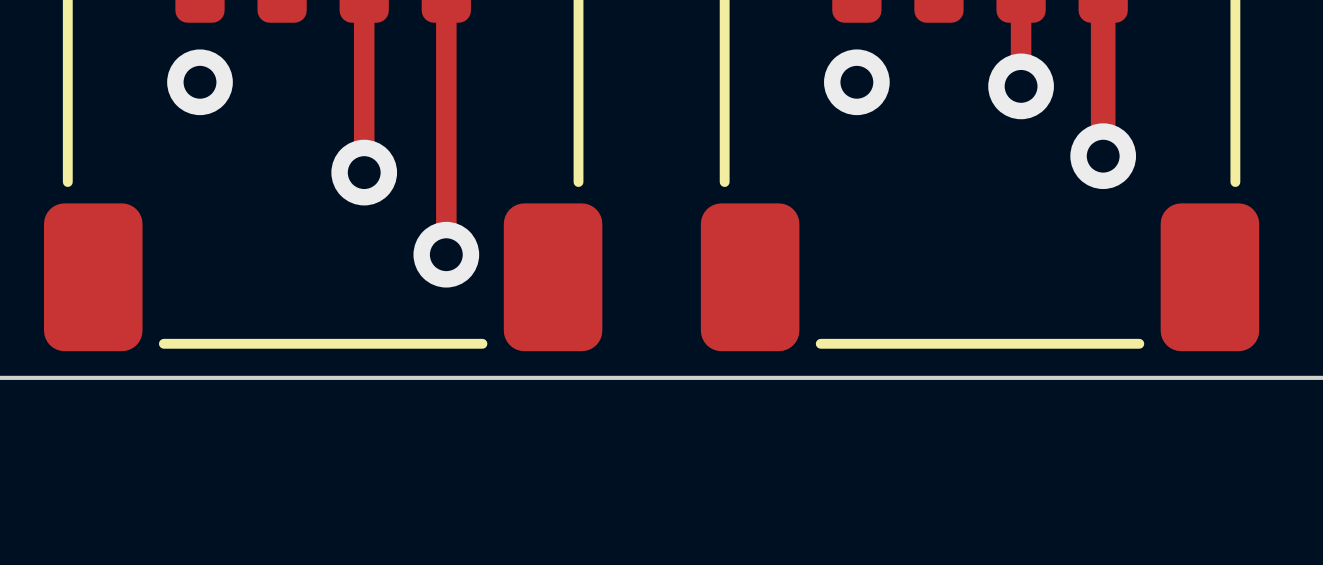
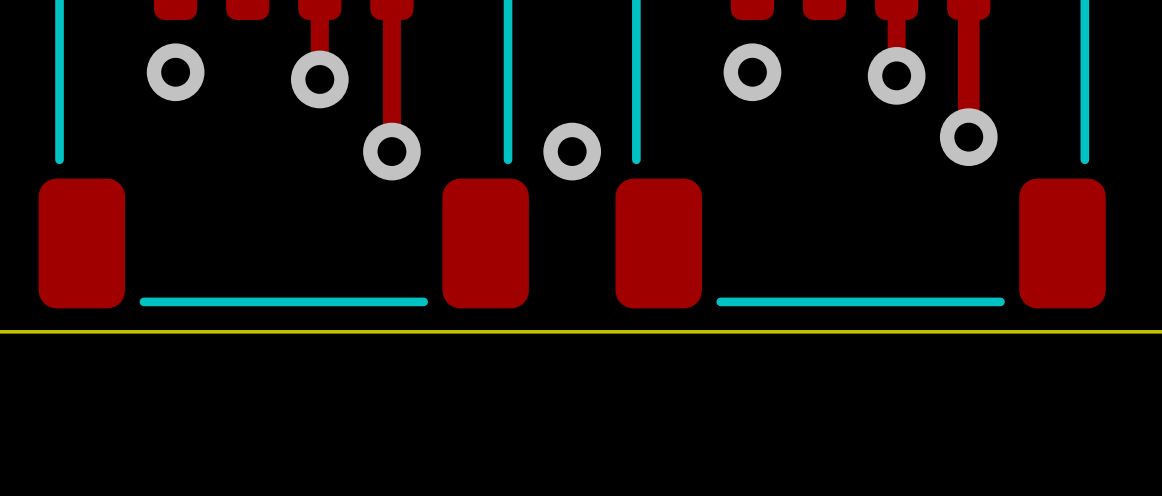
track: (364, 90) (364, 172) -> none
via: none -> (319, 79)
via: (364, 172) -> none
track: (446, 172) (446, 254) -> none
via: none -> (391, 151)
via: none -> (572, 151)
via: (446, 254) -> none

